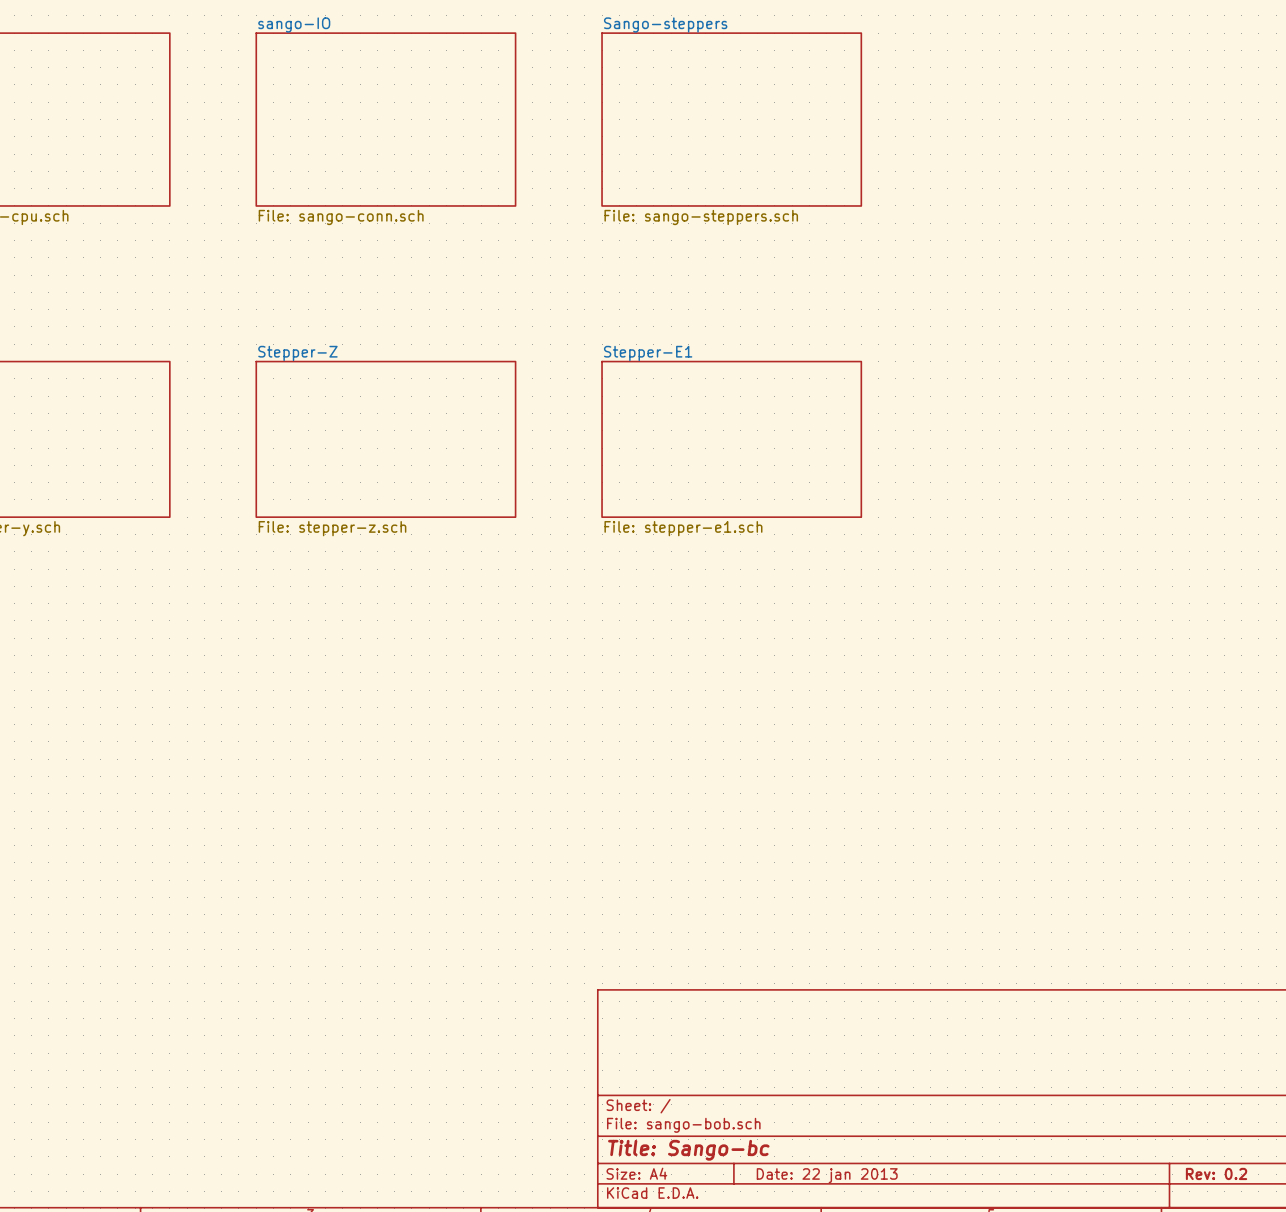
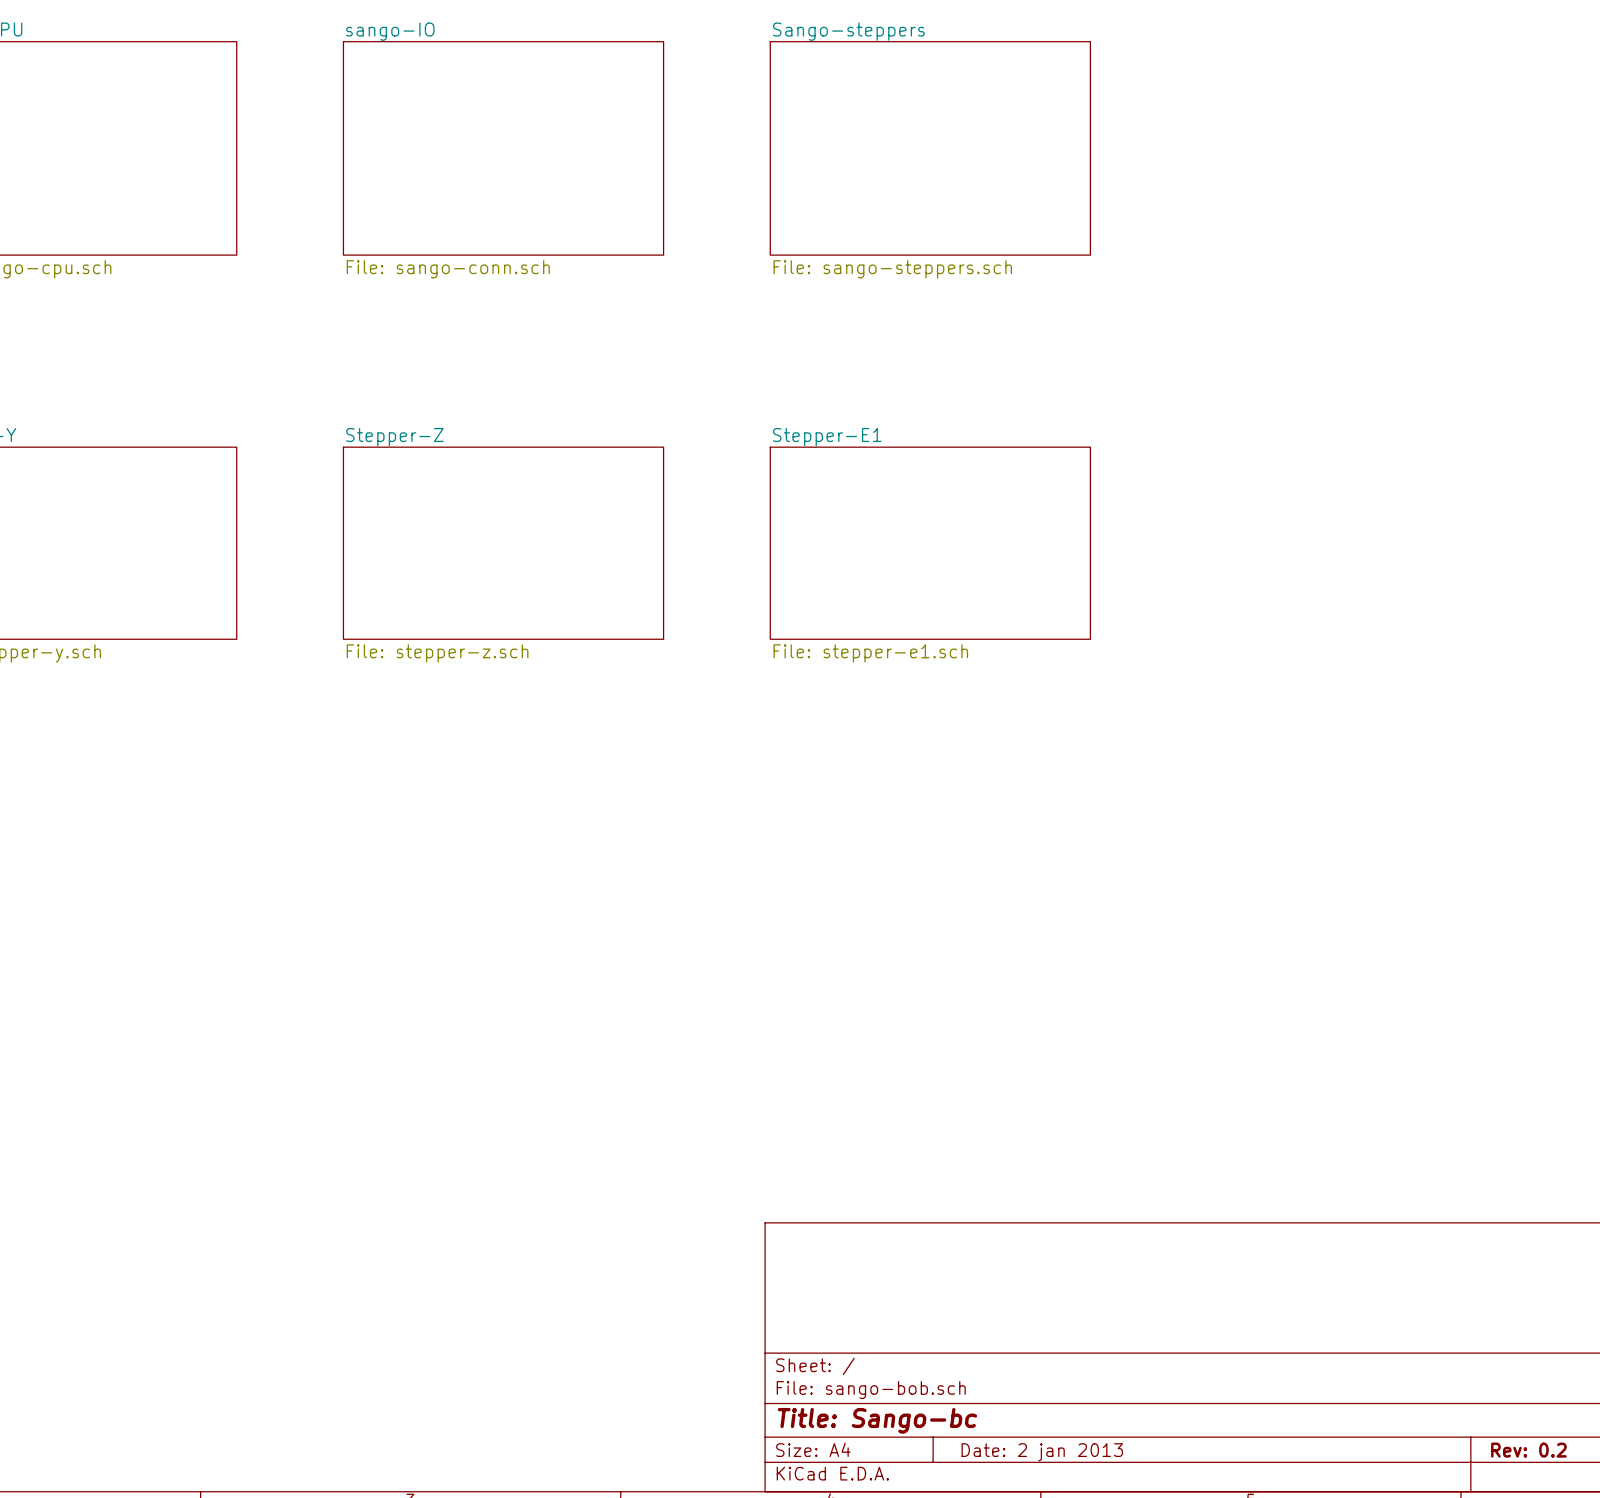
title block: Date: 22 jan 2013 (827, 1175) -> Date: 2 jan 2013 (1042, 1452)

